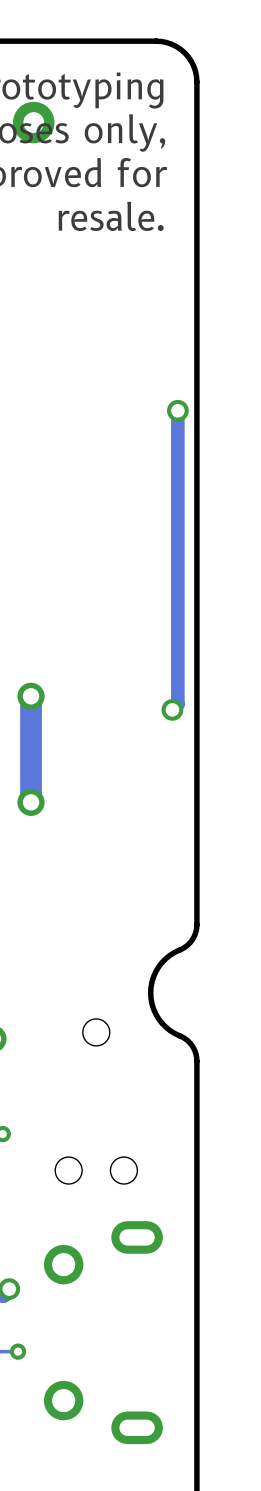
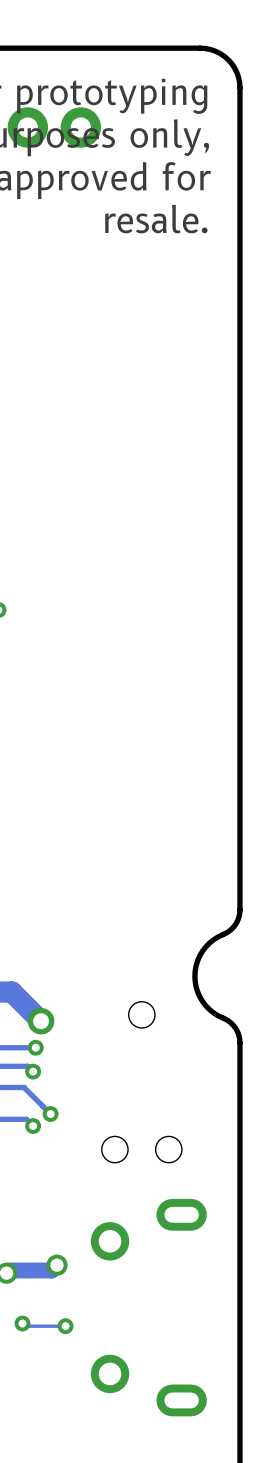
track: (177, 410) (177, 704) (172, 709) -> none
via: (177, 410) -> none
track: (31, 696) (31, 802) -> none
via: (31, 696) -> none
via: (172, 709) -> none
via: (31, 802) -> none

